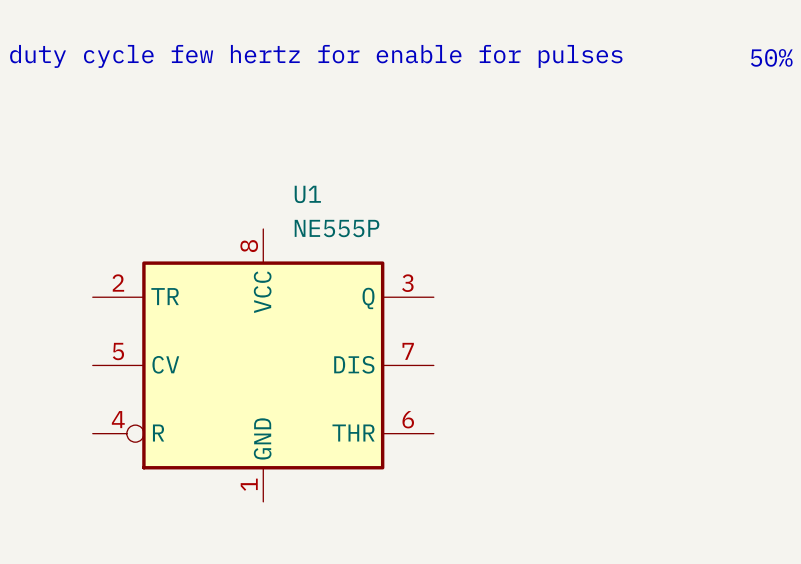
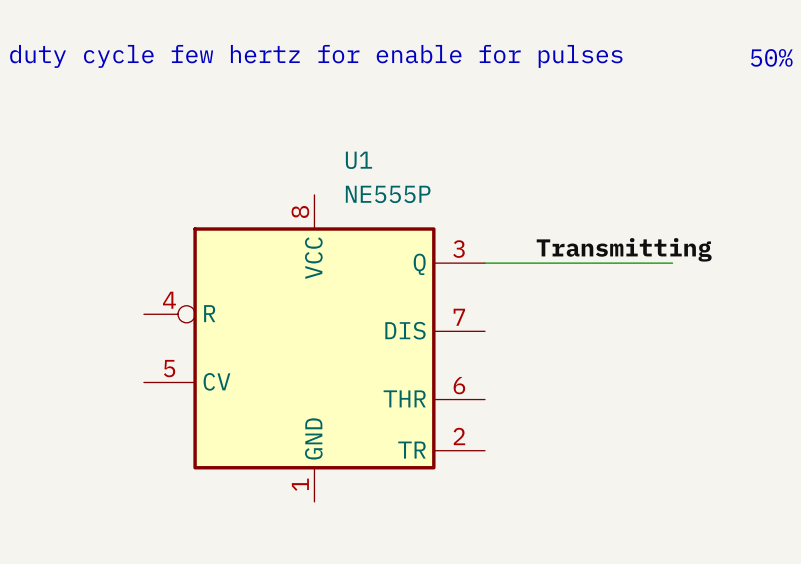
U1 symbol: [92, 229, 434, 502] -> [143, 194, 485, 502]
label: none -> Transmitting (624, 249)
wire: none -> (484, 263) (672, 263)

